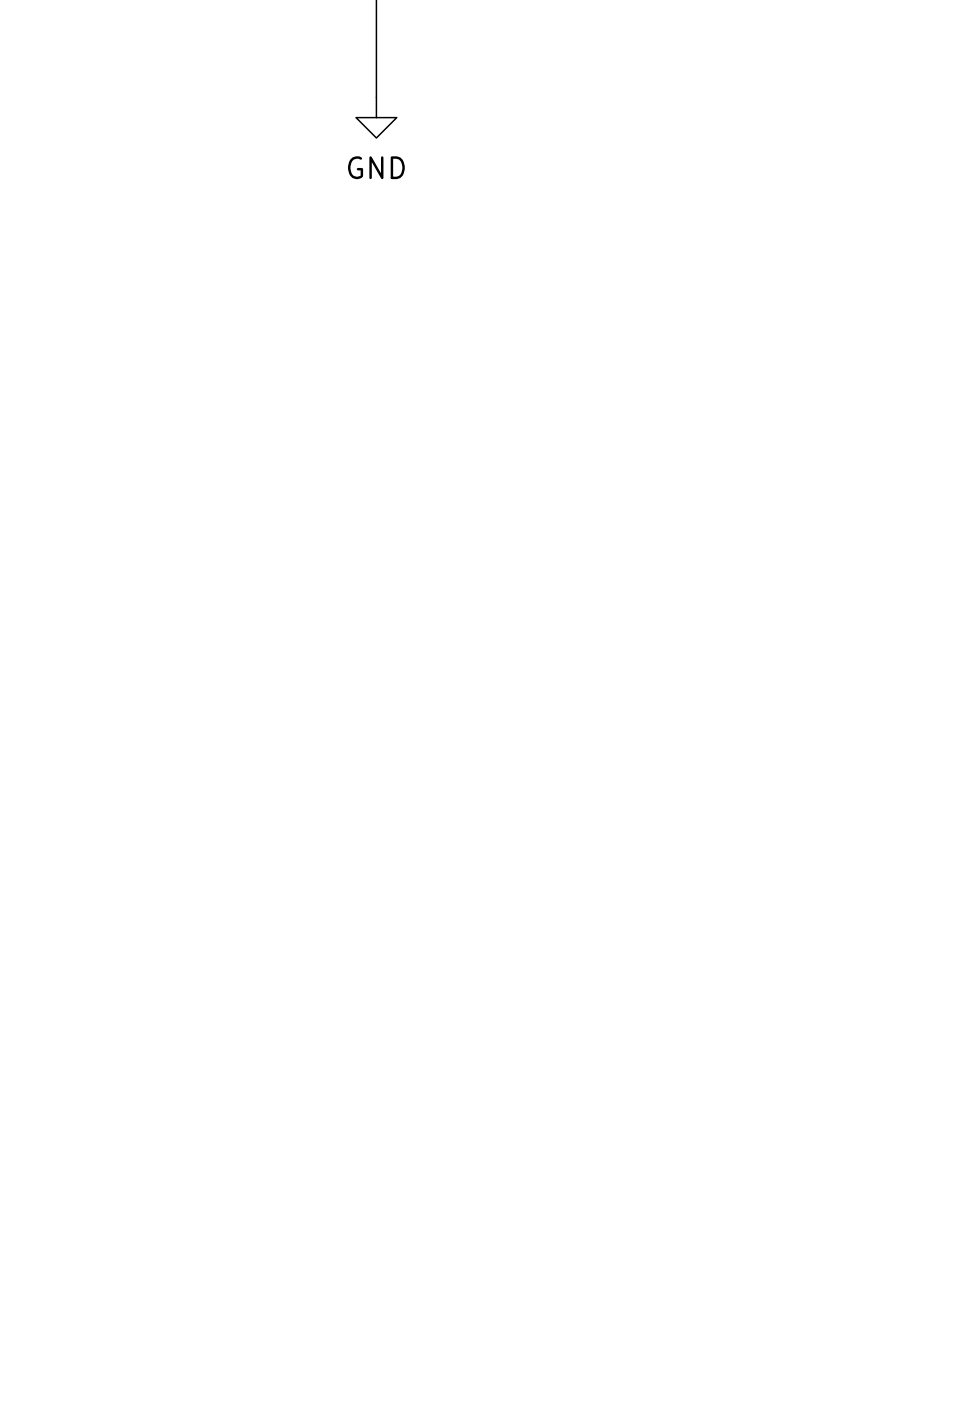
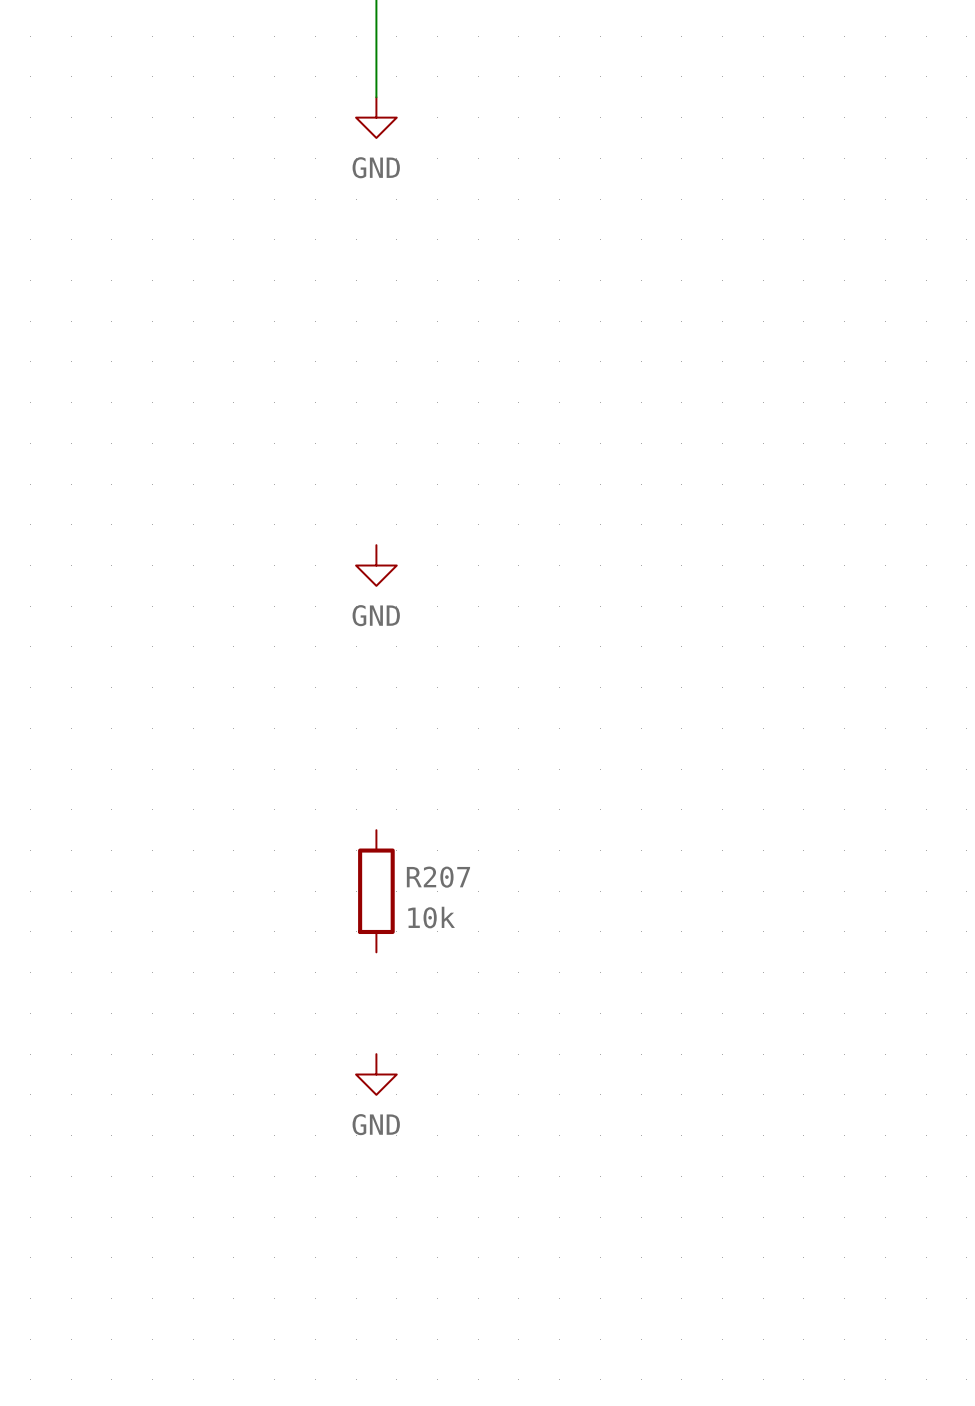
power symbol: none -> GND (376, 565)
R207: none -> 10k (376, 891)
power symbol: none -> GND (376, 1074)

